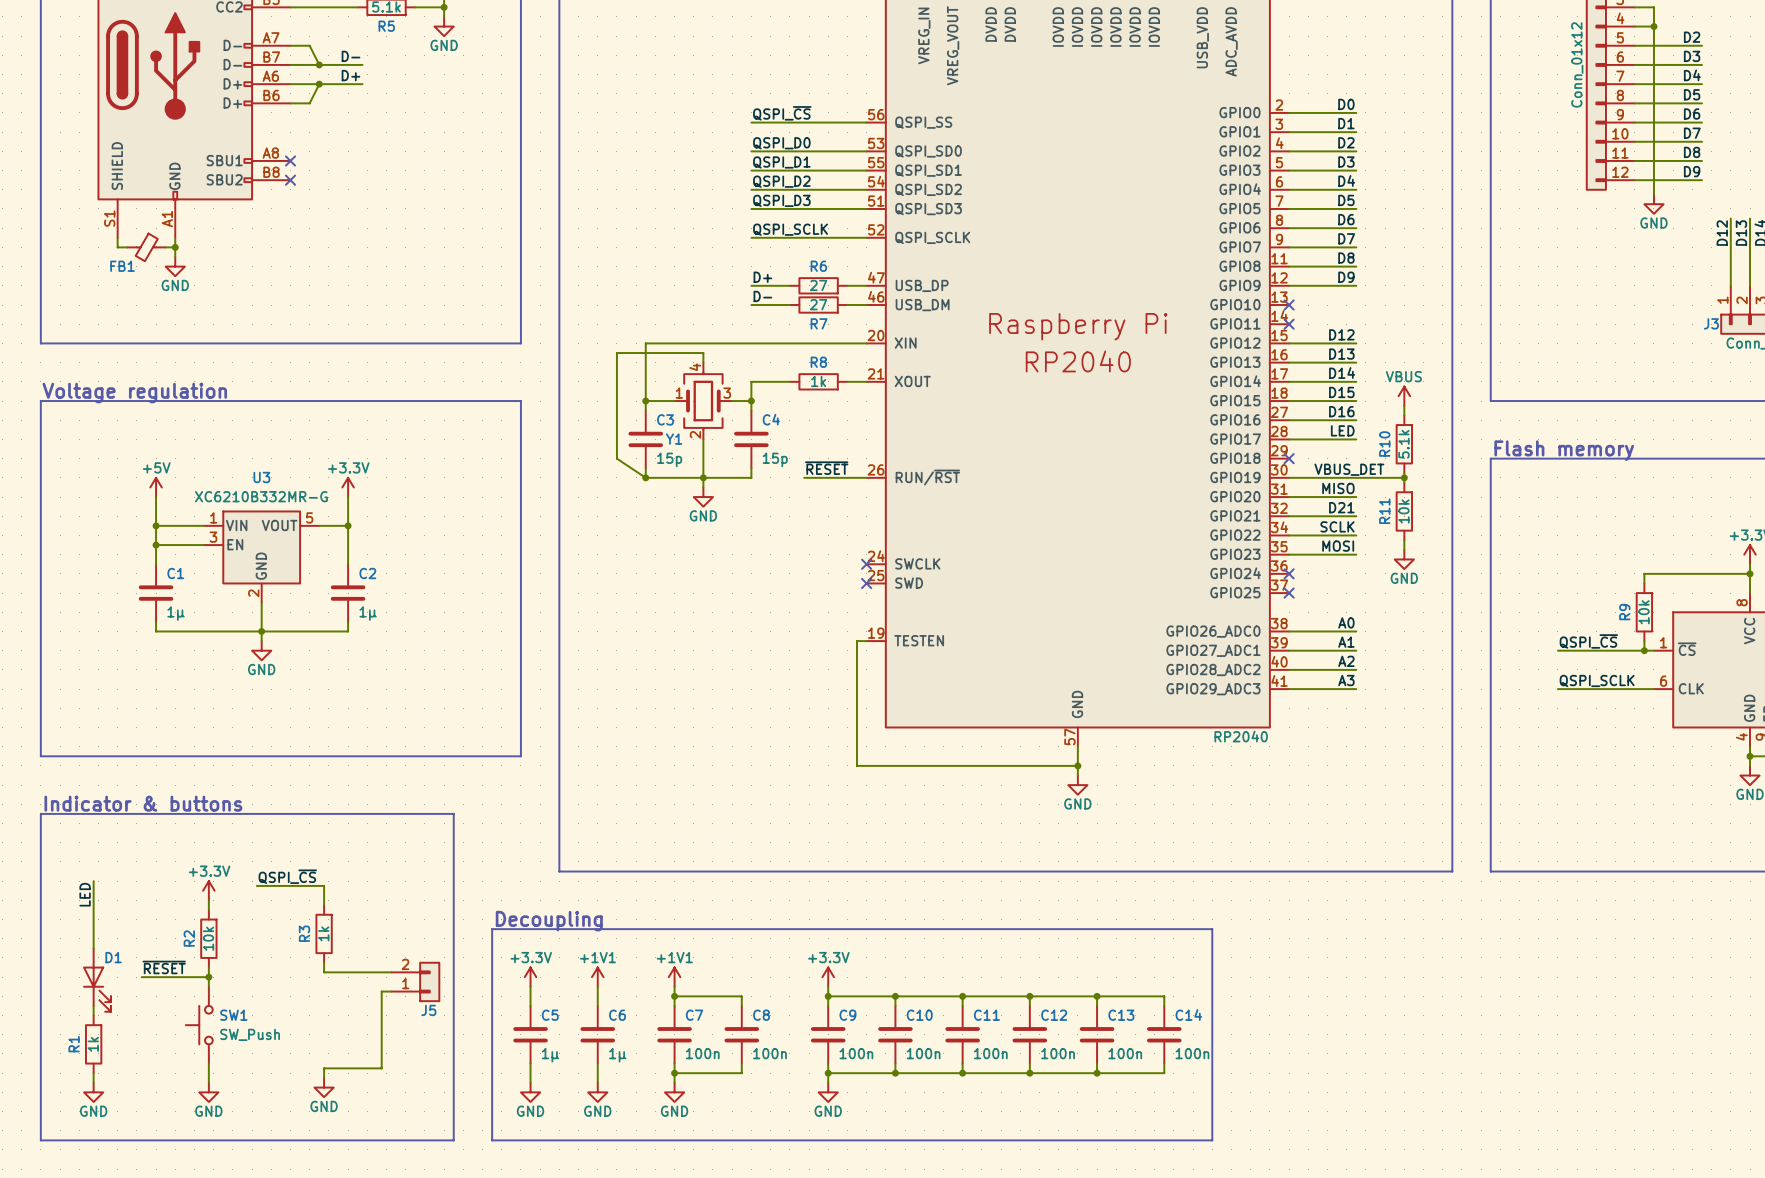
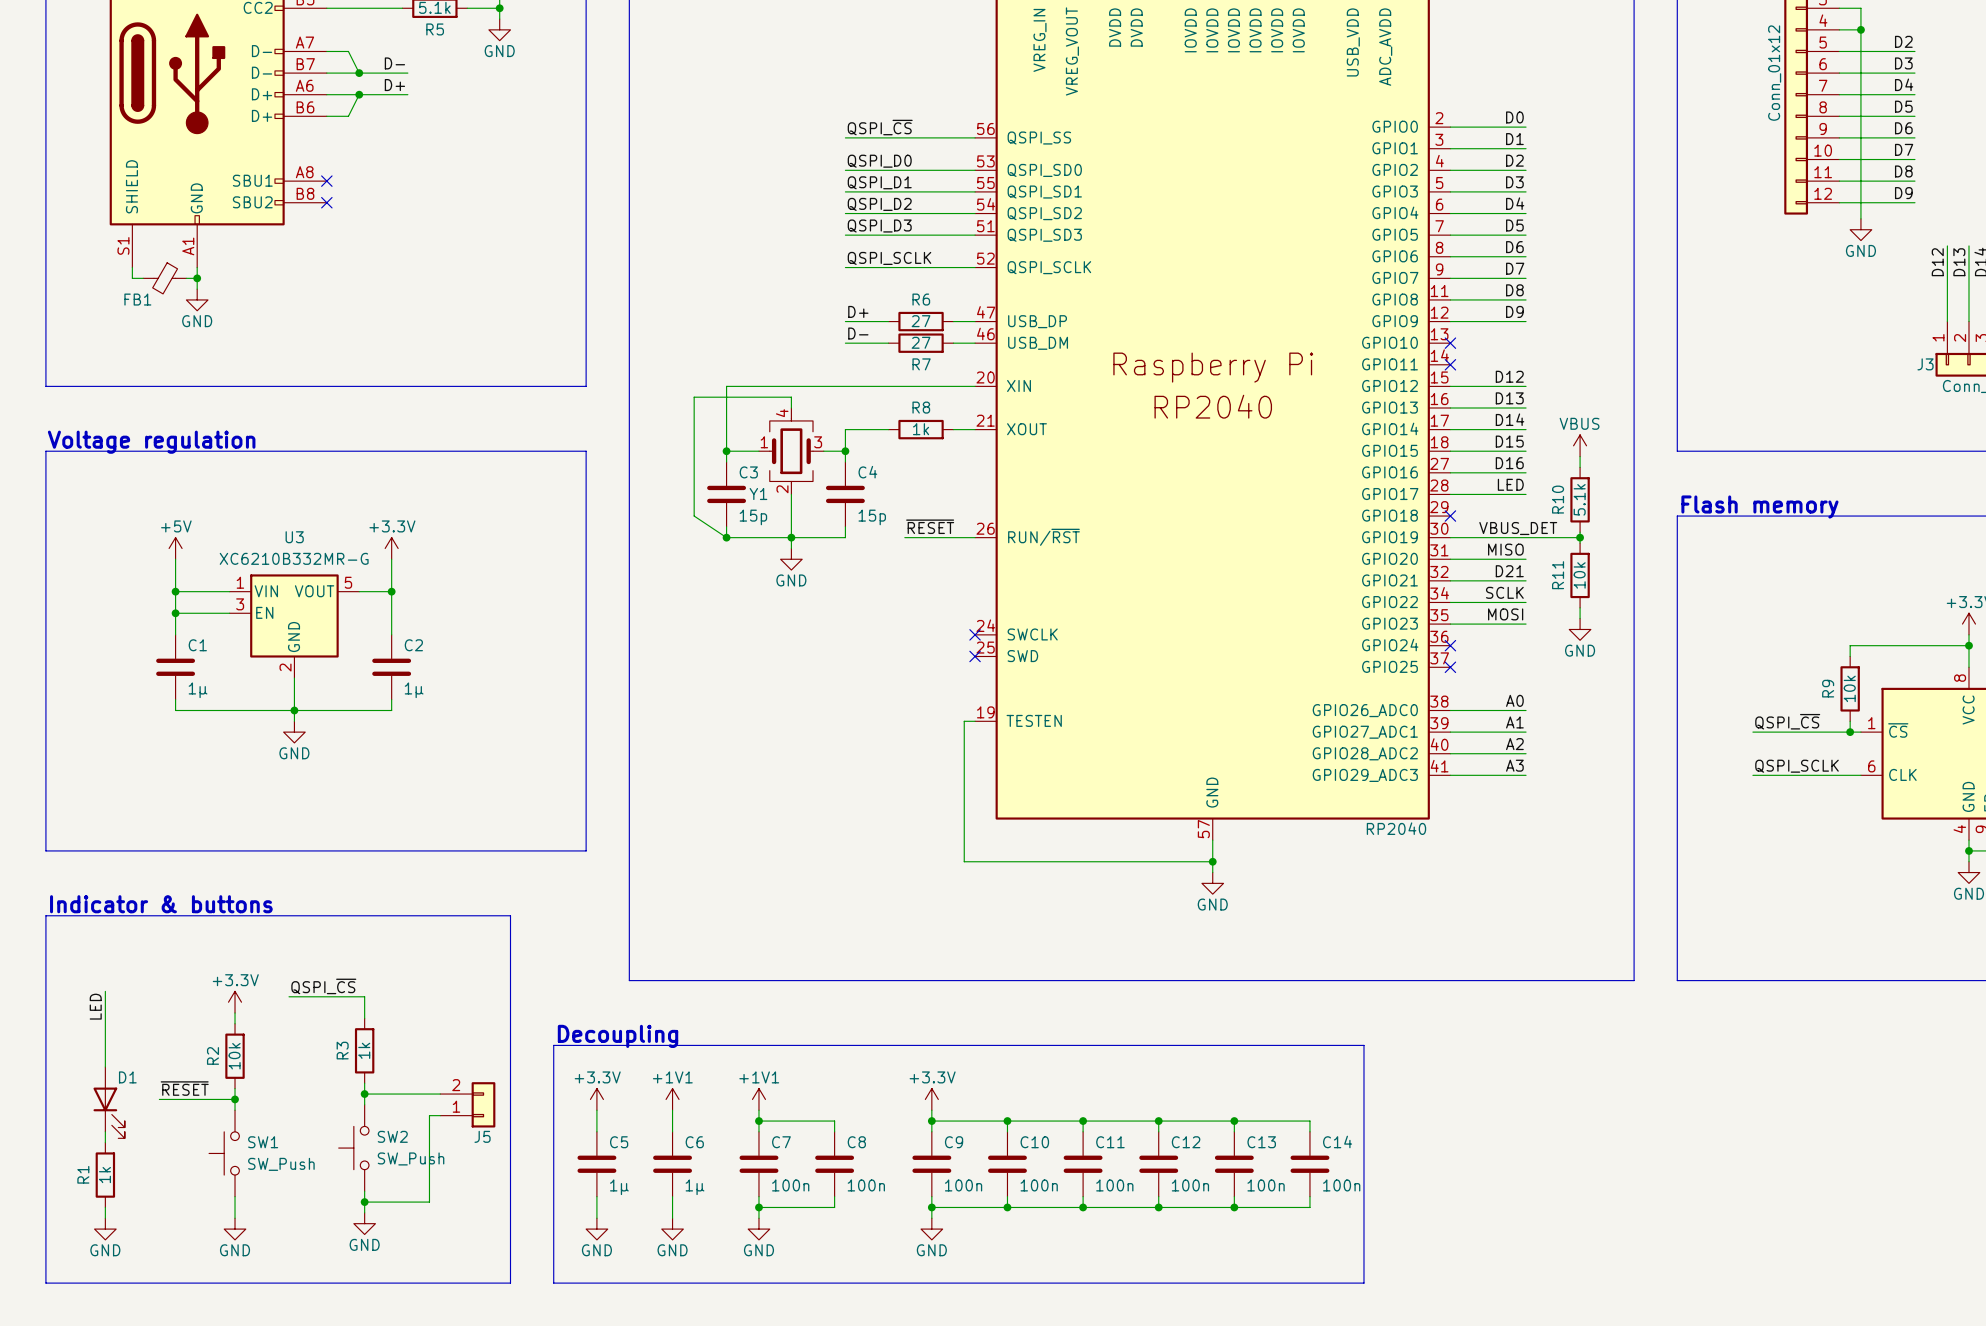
wire: none -> (364, 1094) (364, 1104)
junction: none -> (364, 1094)
SW2: none -> SW_Push (353, 1148)
wire: none -> (364, 1191) (364, 1202)
junction: none -> (364, 1202)

